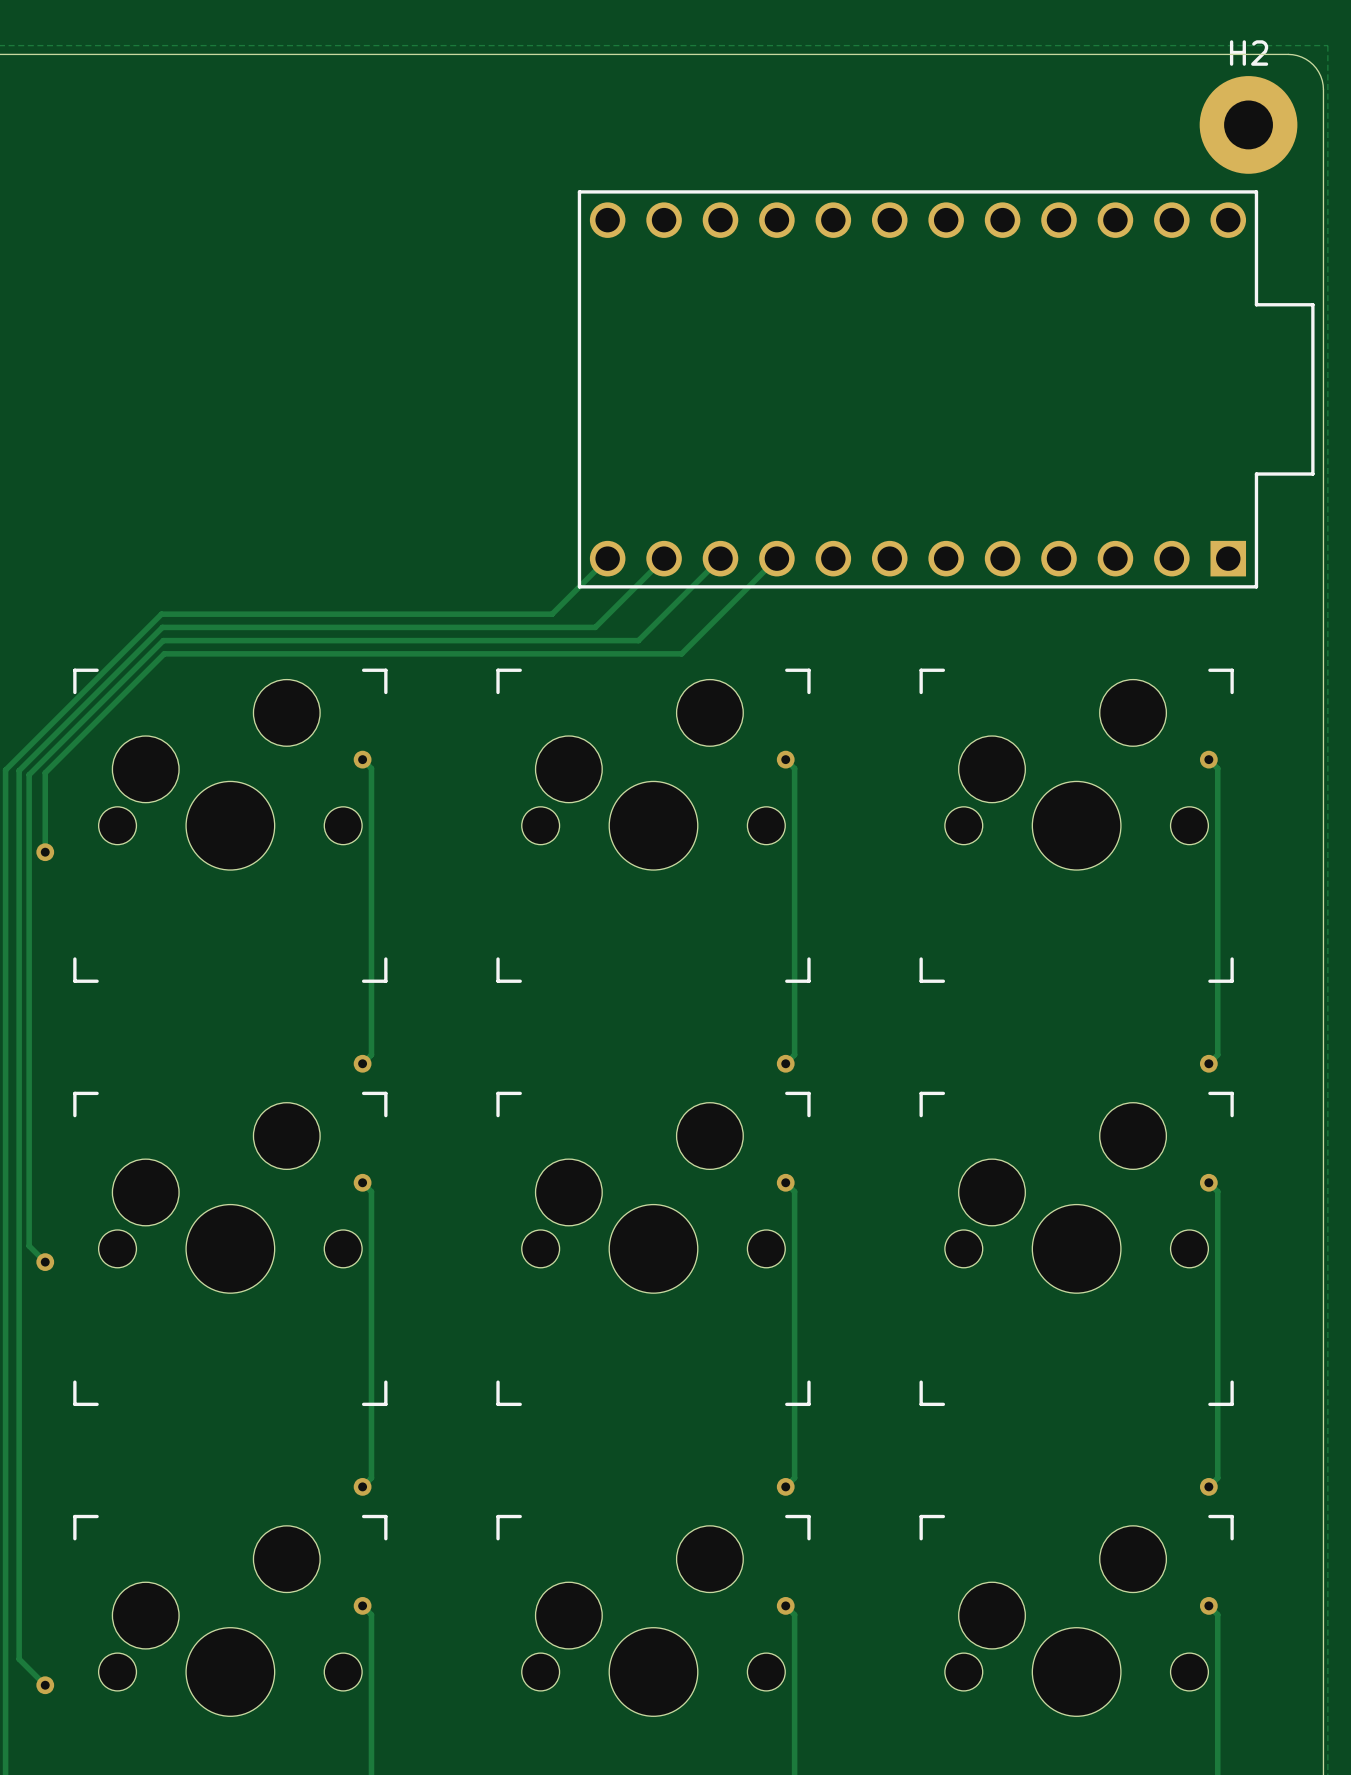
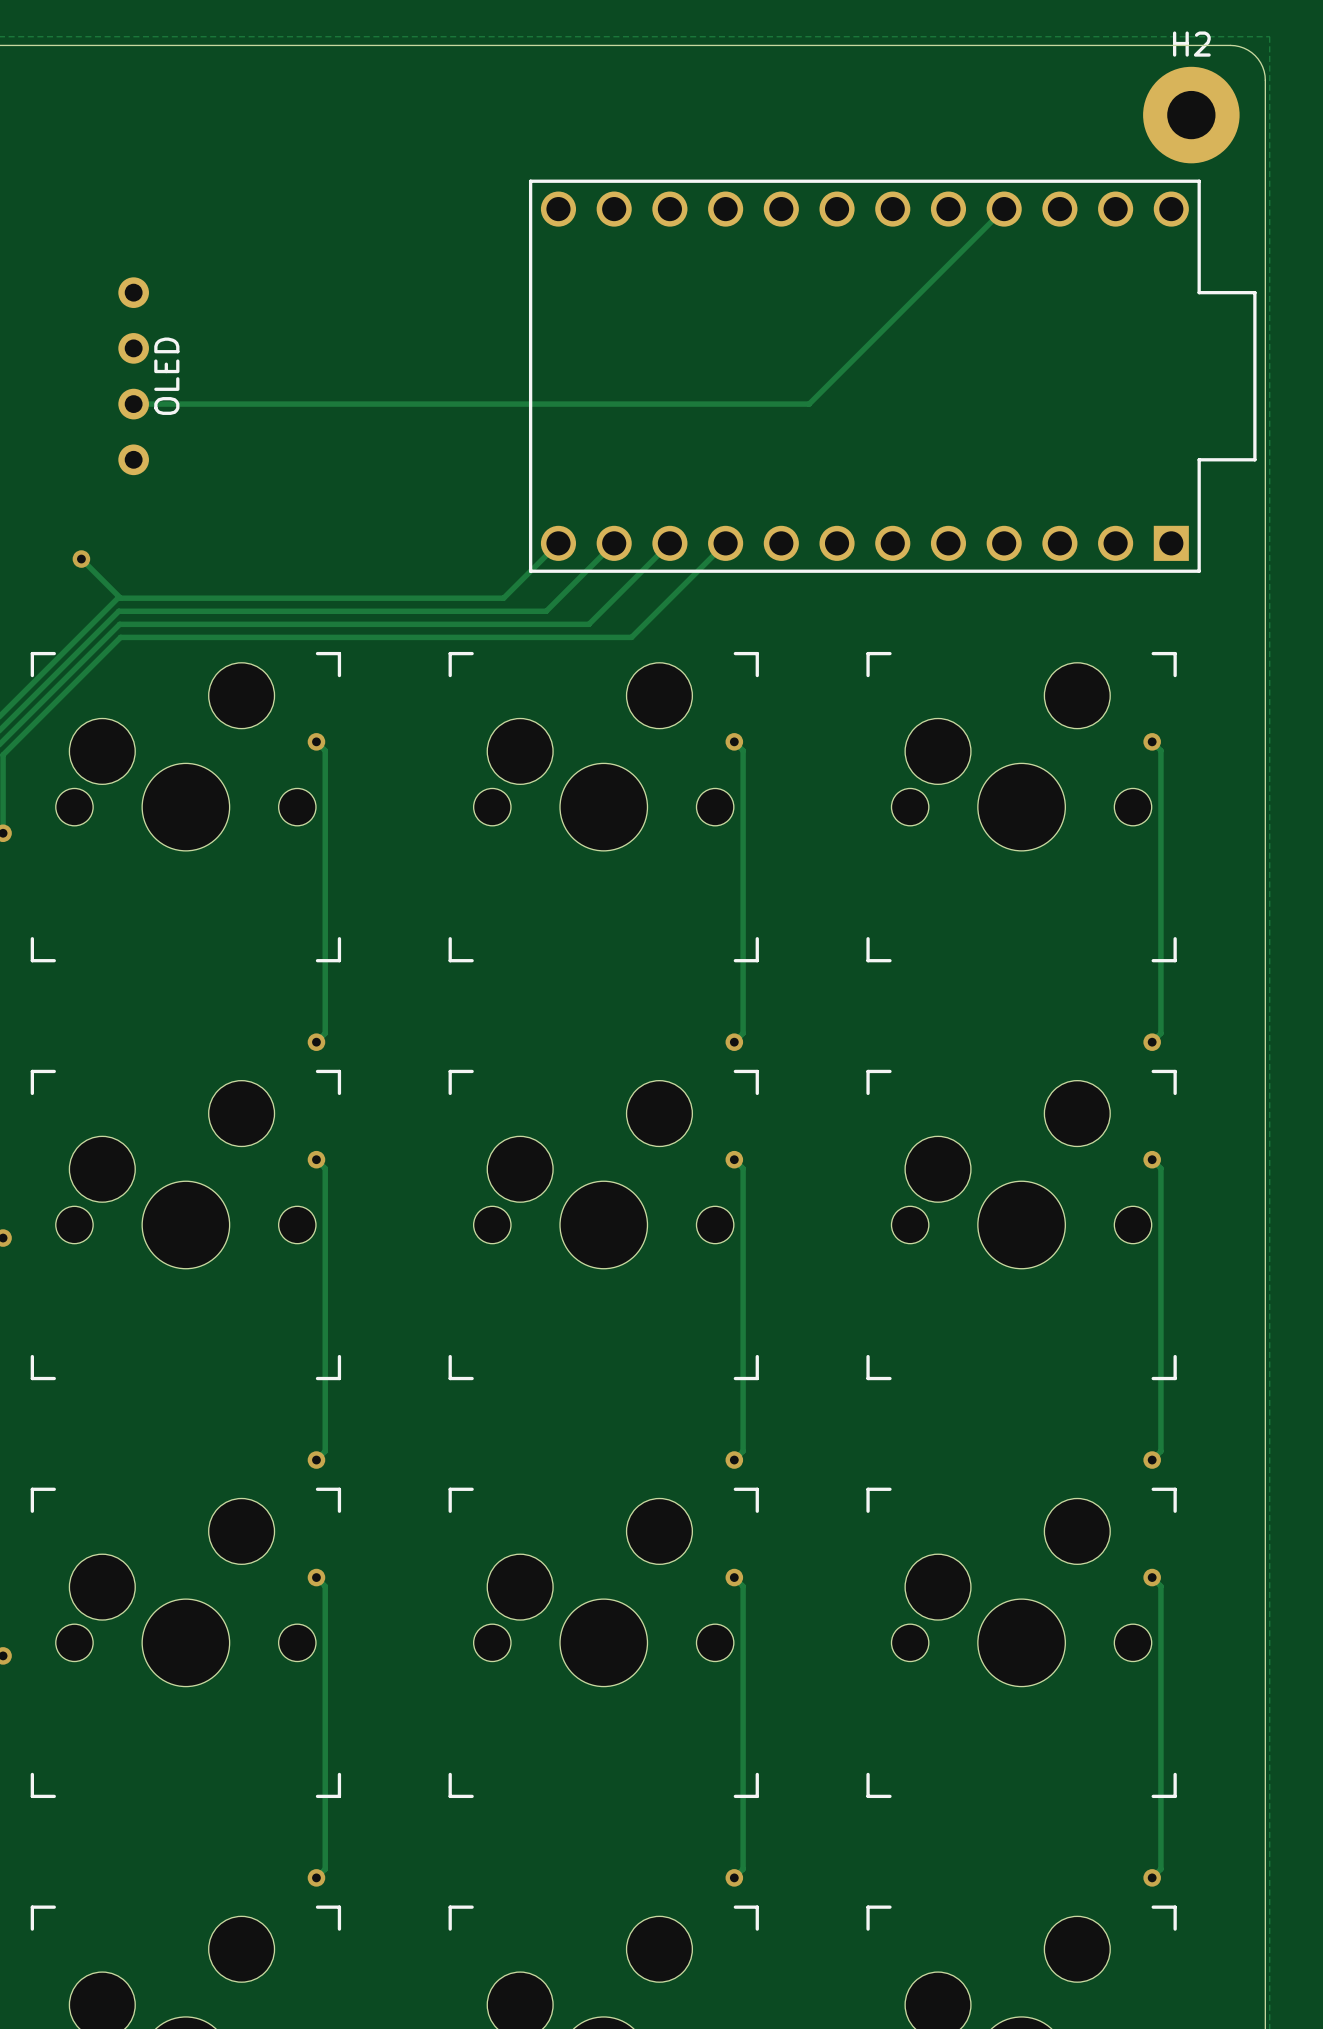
track: none -> (1004, 209) (809, 404) (133, 404)
part: none -> (133, 376)
track: none -> (81, 559) (120, 598)
via: none -> (81, 559)

